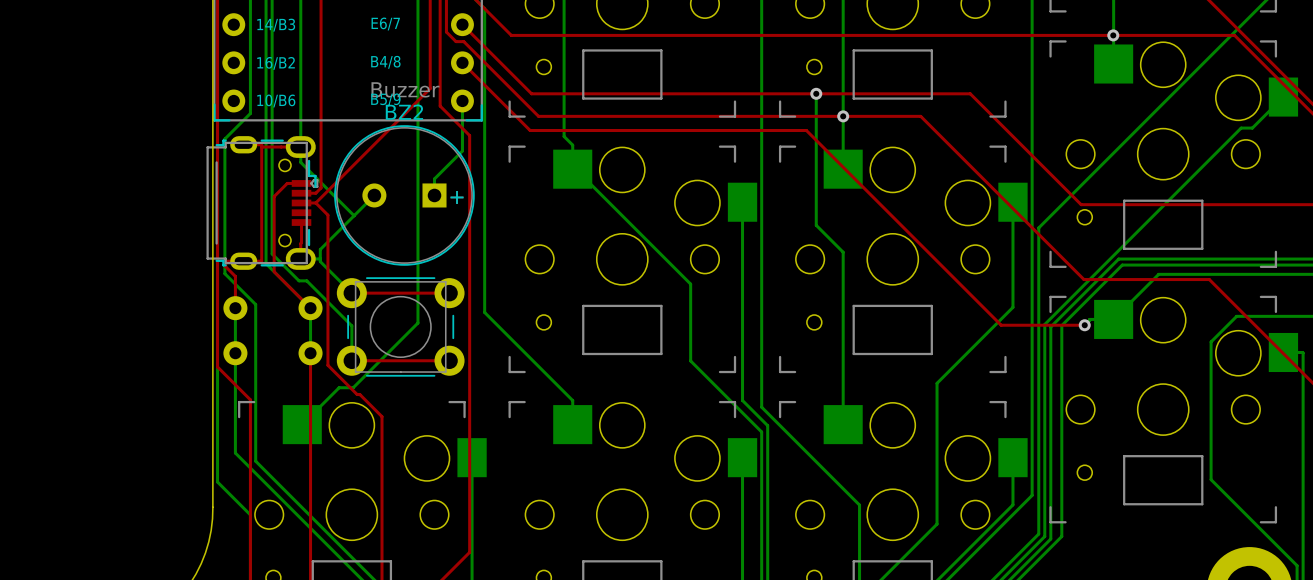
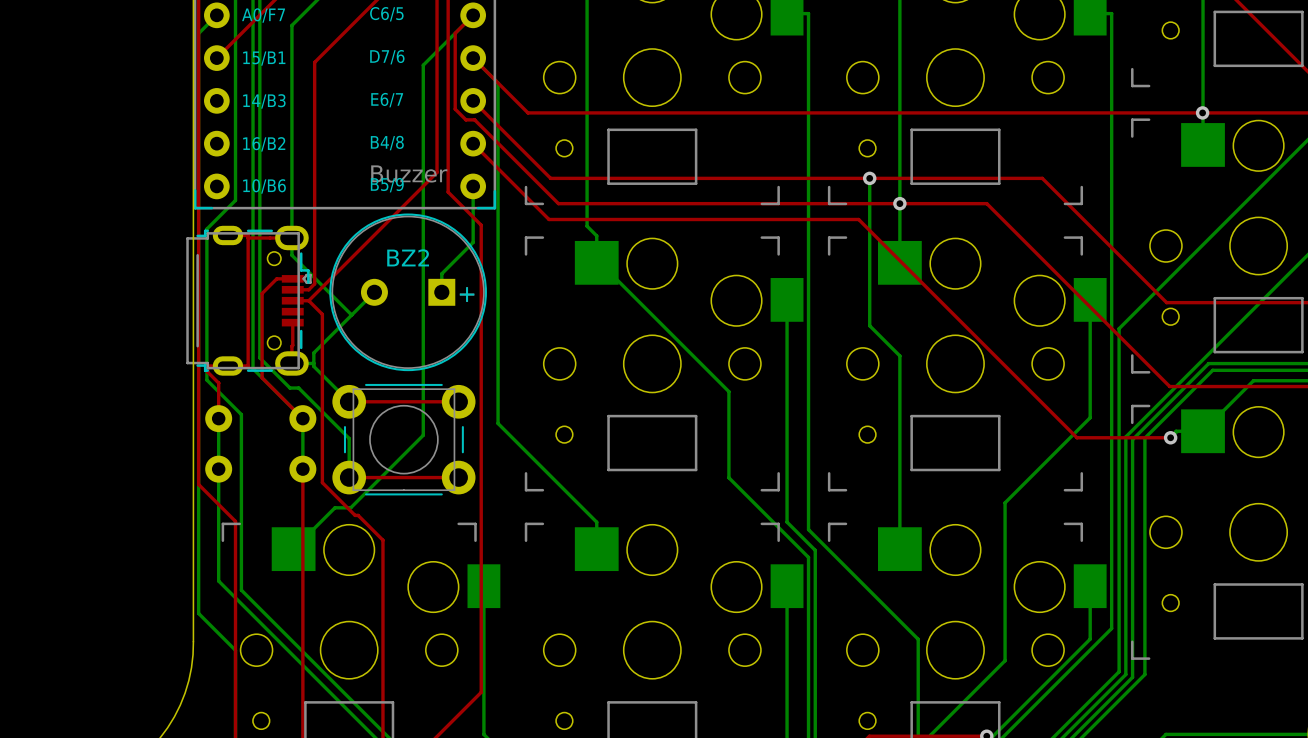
BZ2 name position: BZ2 (404, 112) -> BZ2 (408, 257)

